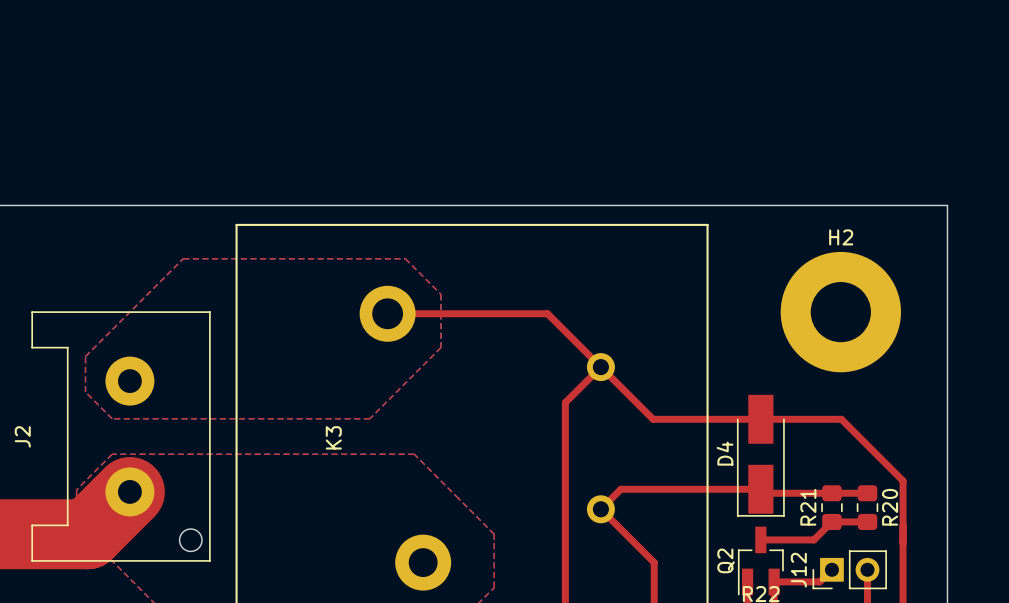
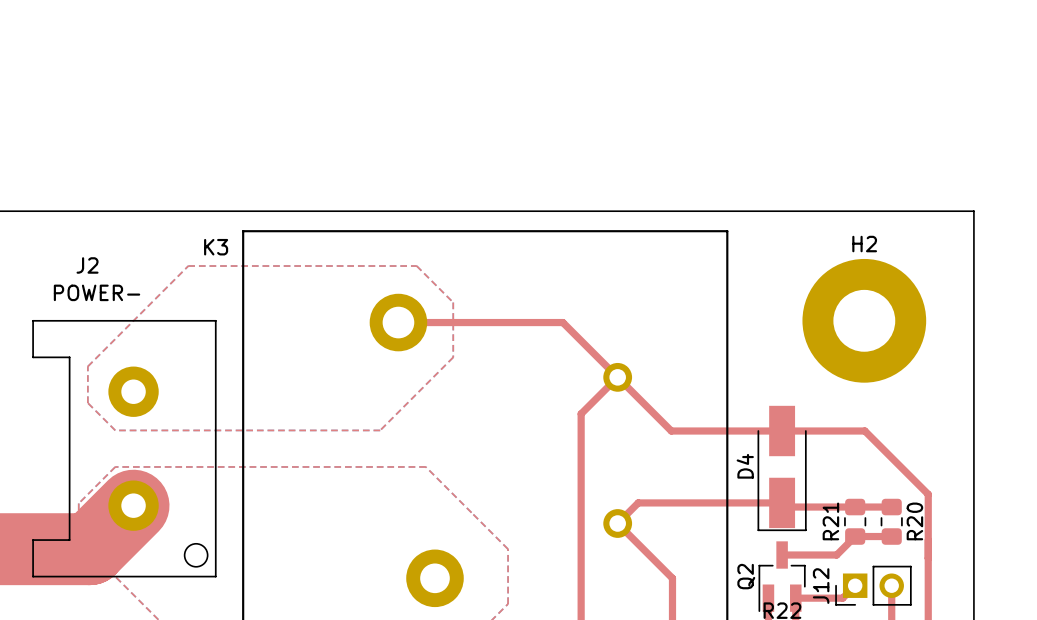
J2 value: none -> POWER- (97, 292)
J2 name rotation: 0° (22, 436) -> 90° clockwise (87, 265)
J2 name position: J2 (22, 436) -> J2 (87, 265)
K3 name rotation: 0° (333, 437) -> 90° clockwise (216, 247)
K3 name position: K3 (333, 437) -> K3 (216, 247)

